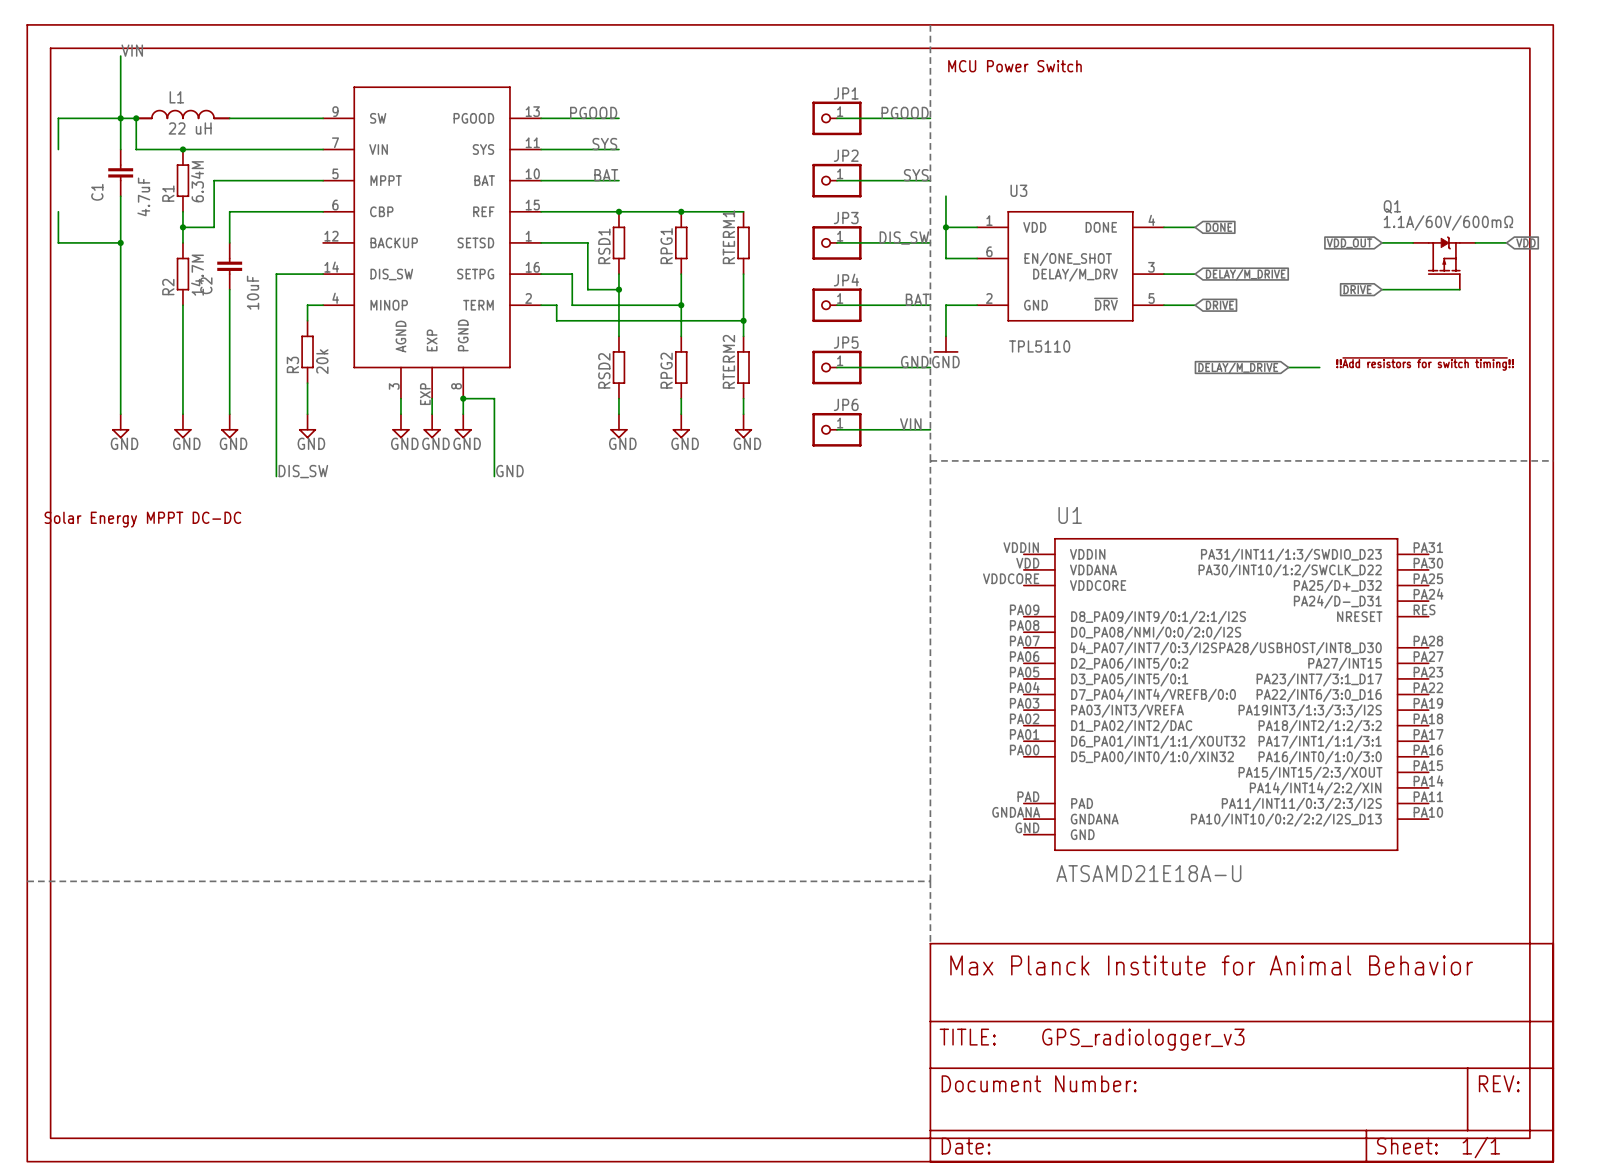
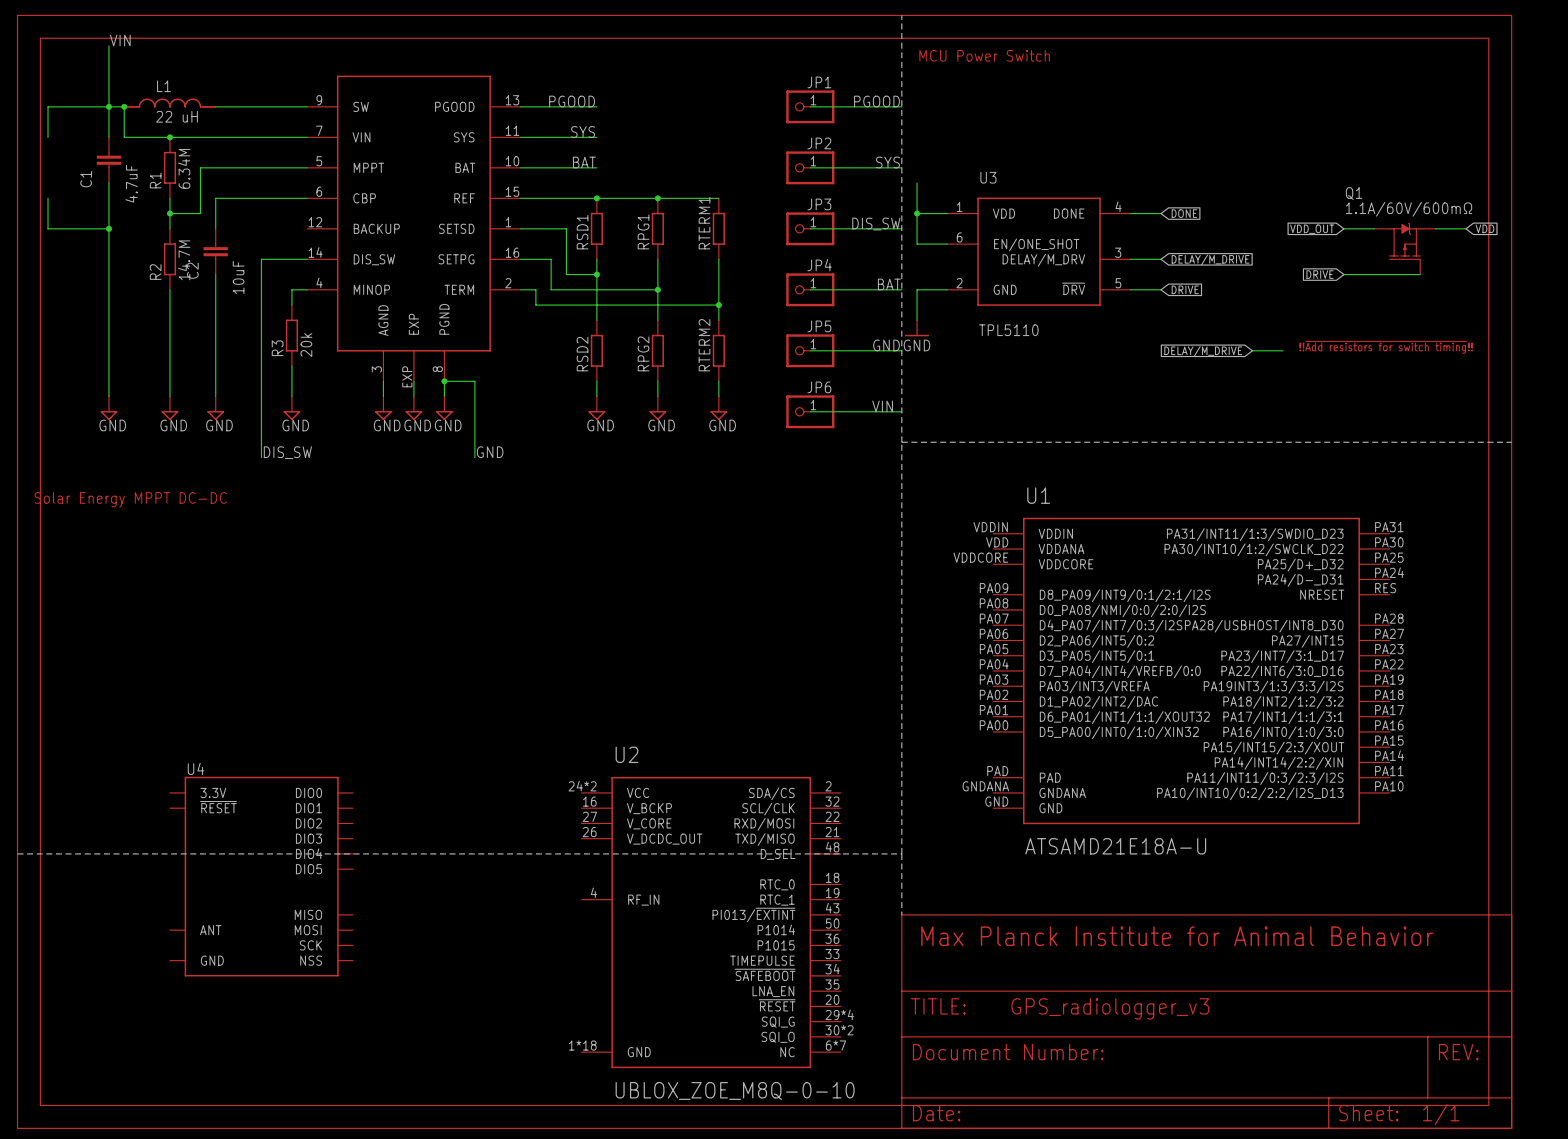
U4: none -> (261, 876)
U2: none -> UBLOX_ZOE_M8Q-0-10 (711, 922)

